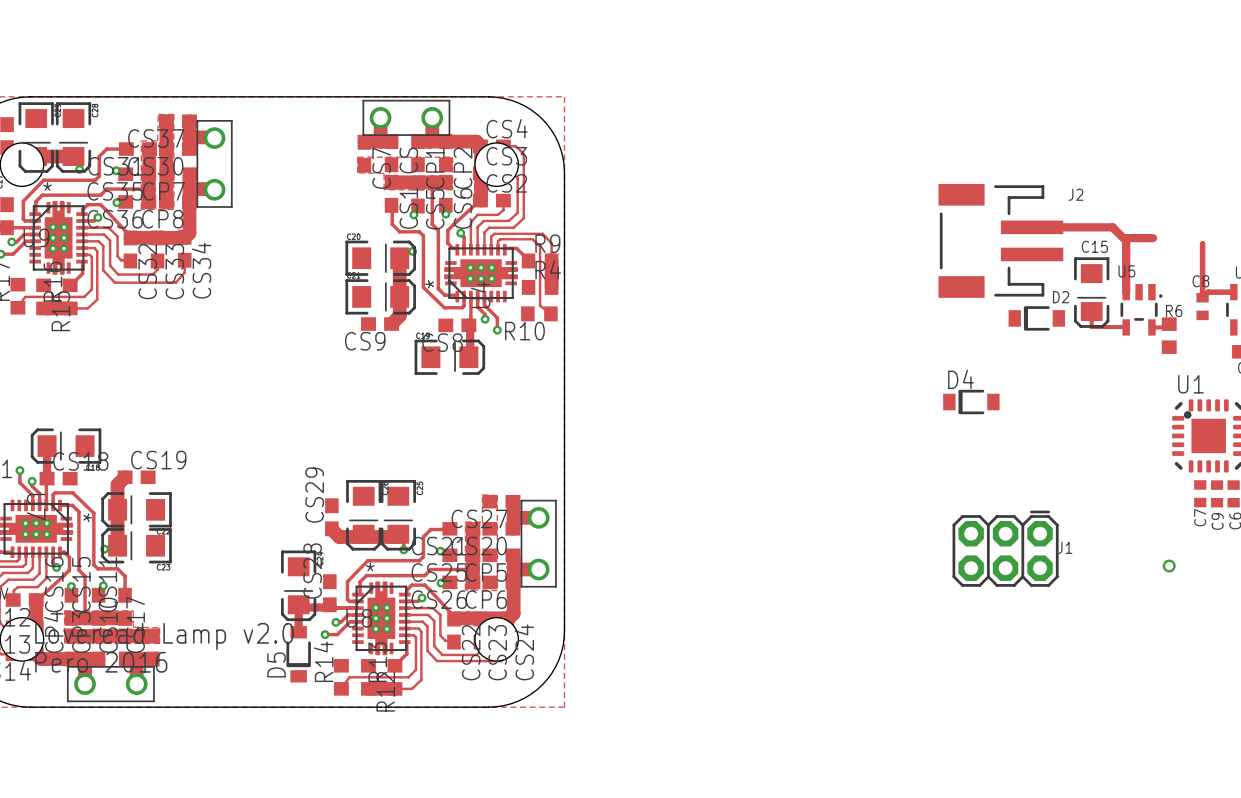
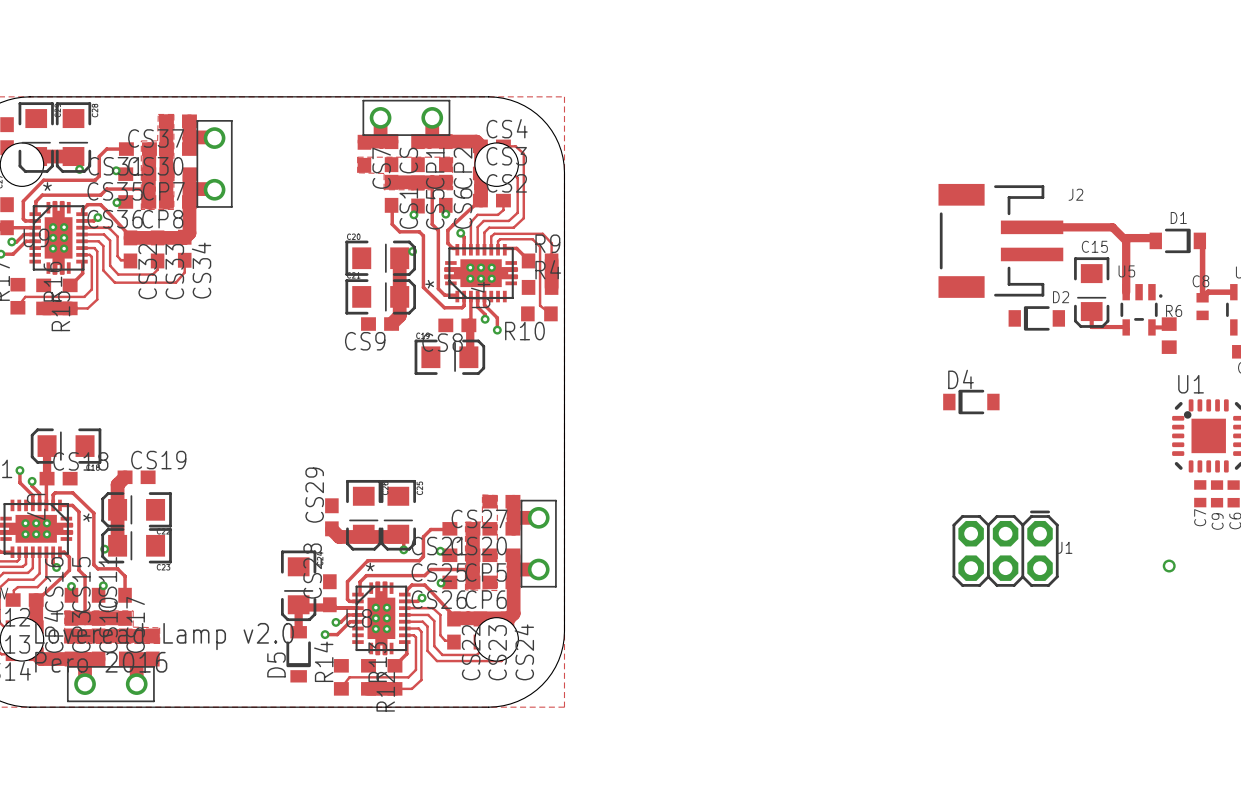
D1: none -> (1177, 240)

